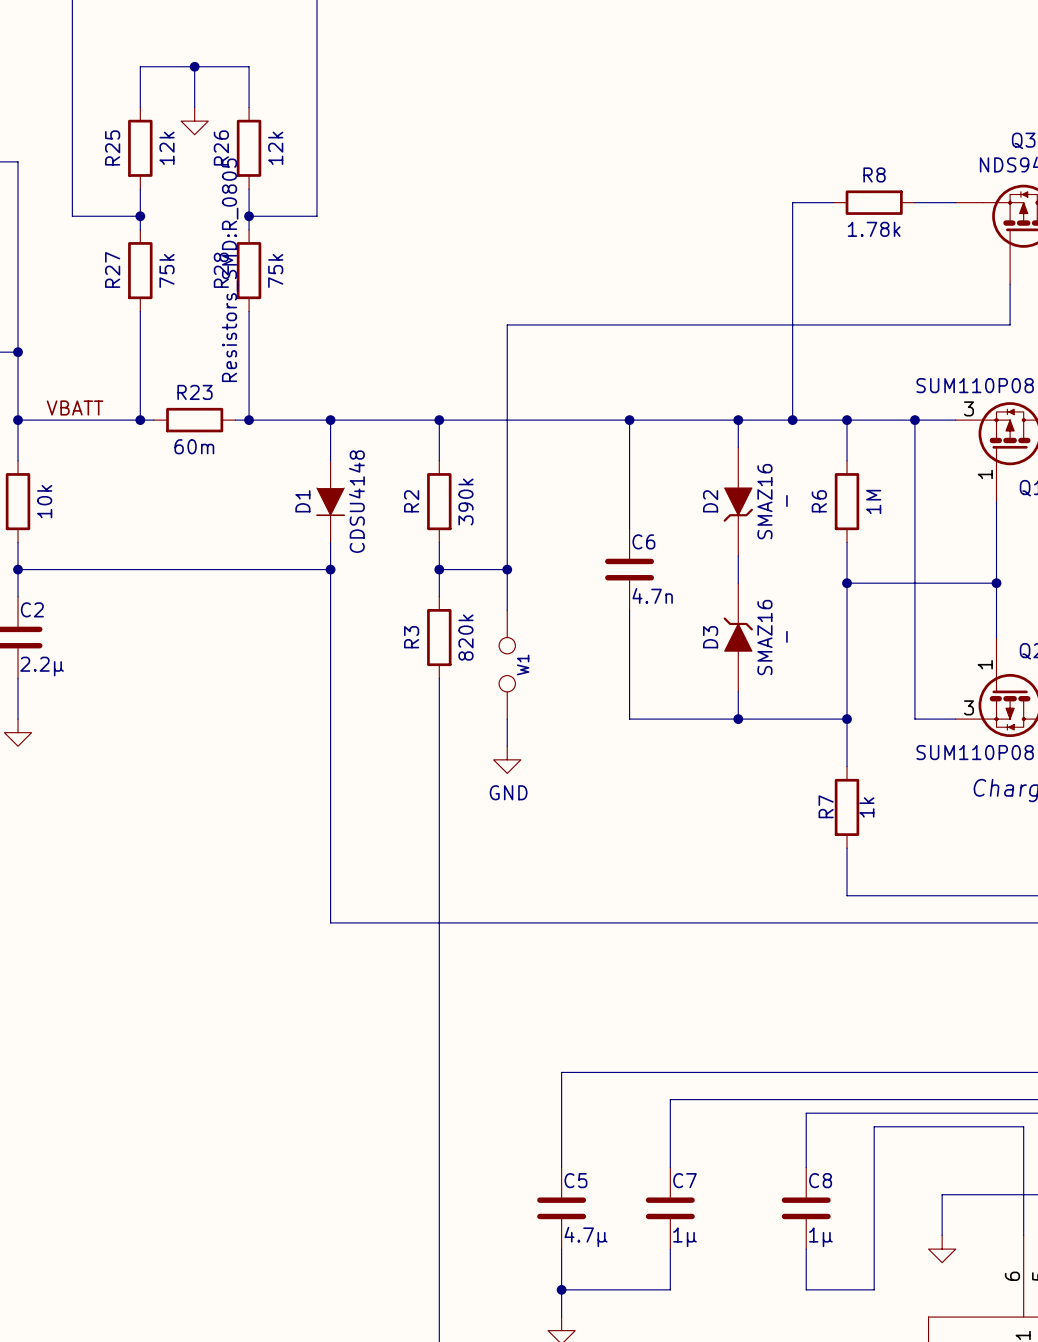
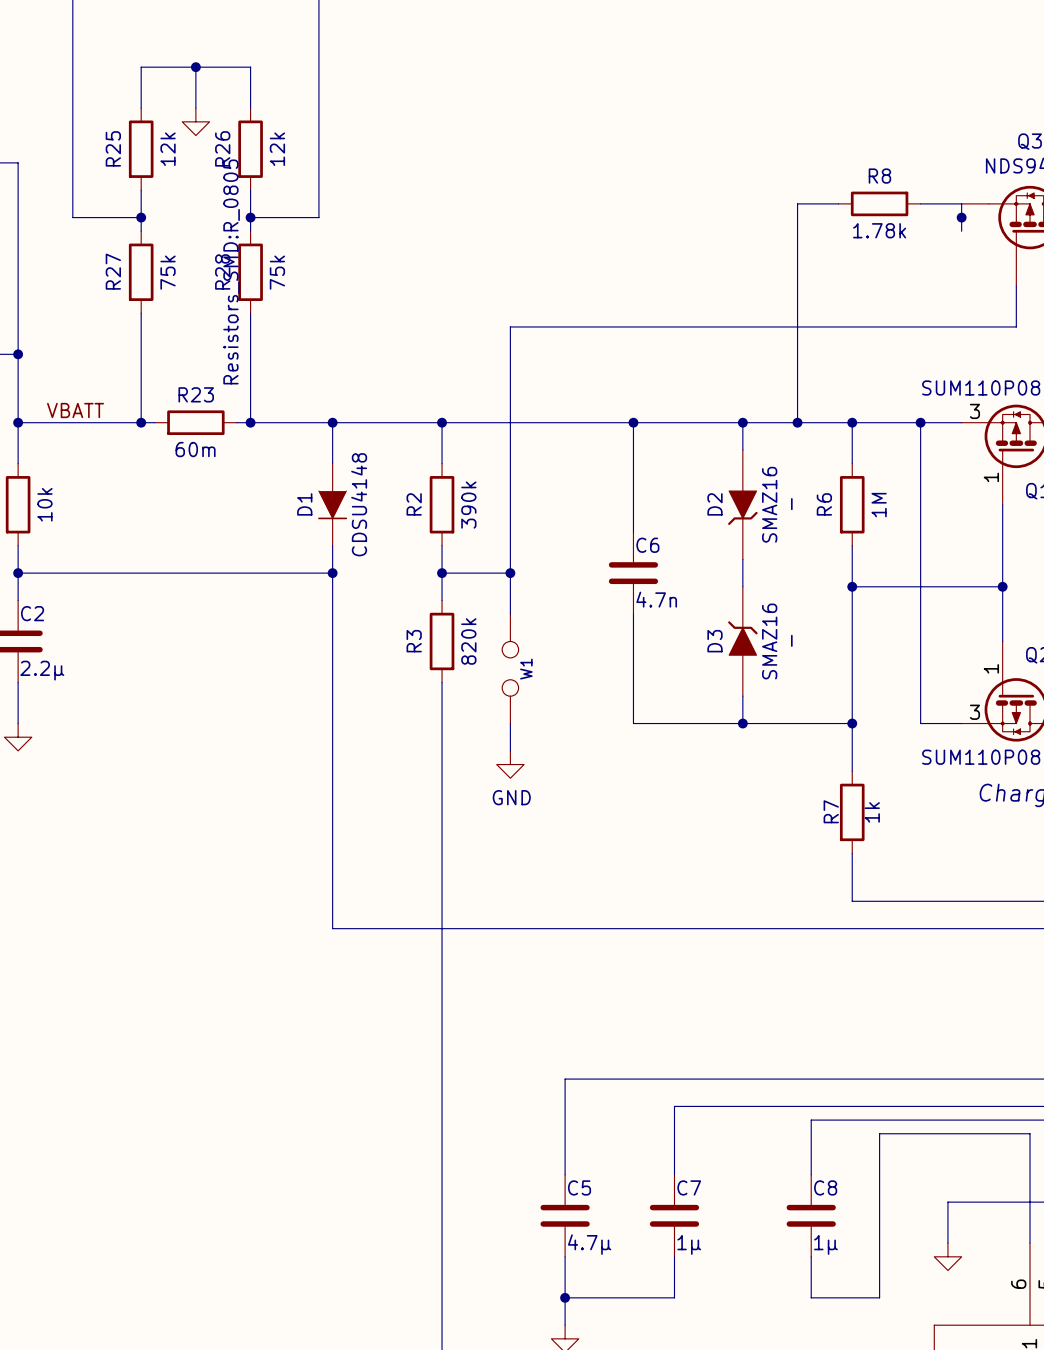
wire: none -> (961, 203) (961, 231)
junction: none -> (961, 217)

